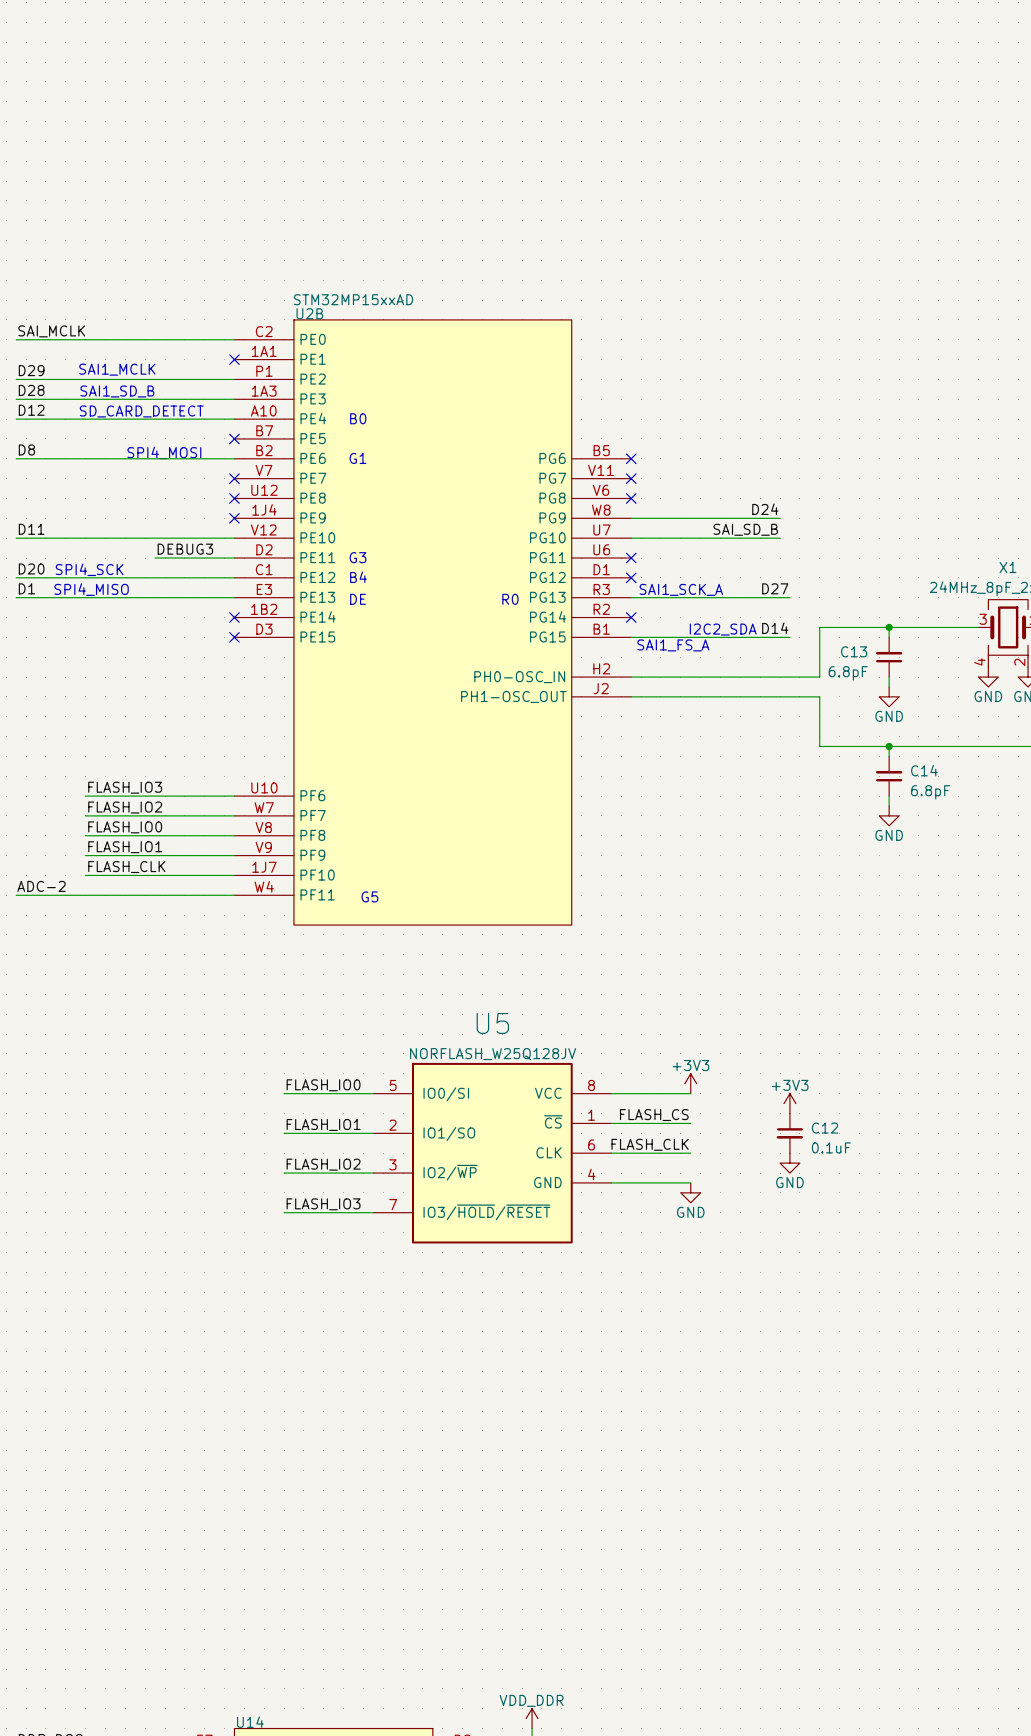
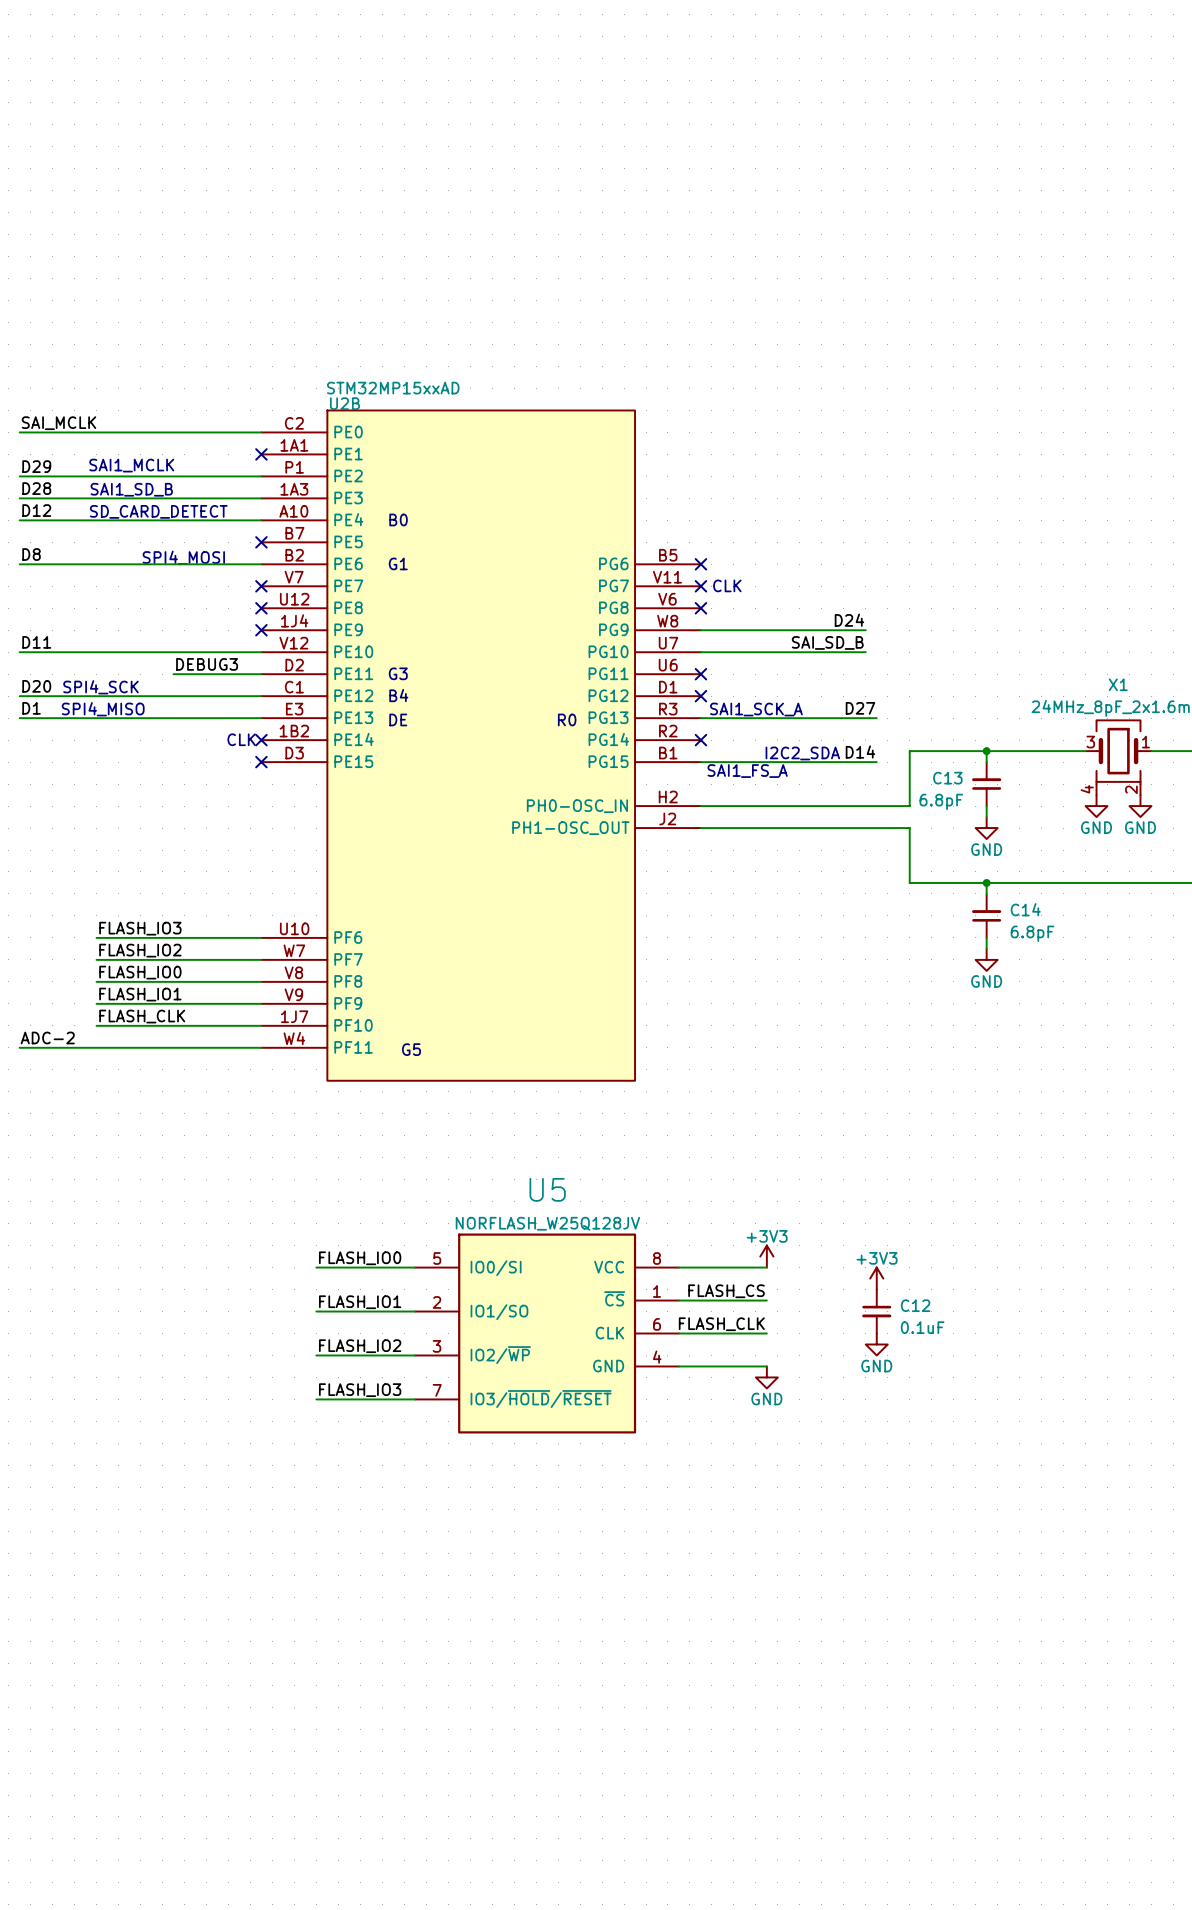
text: none -> CLK (727, 585)
text: none -> CLK (241, 739)

